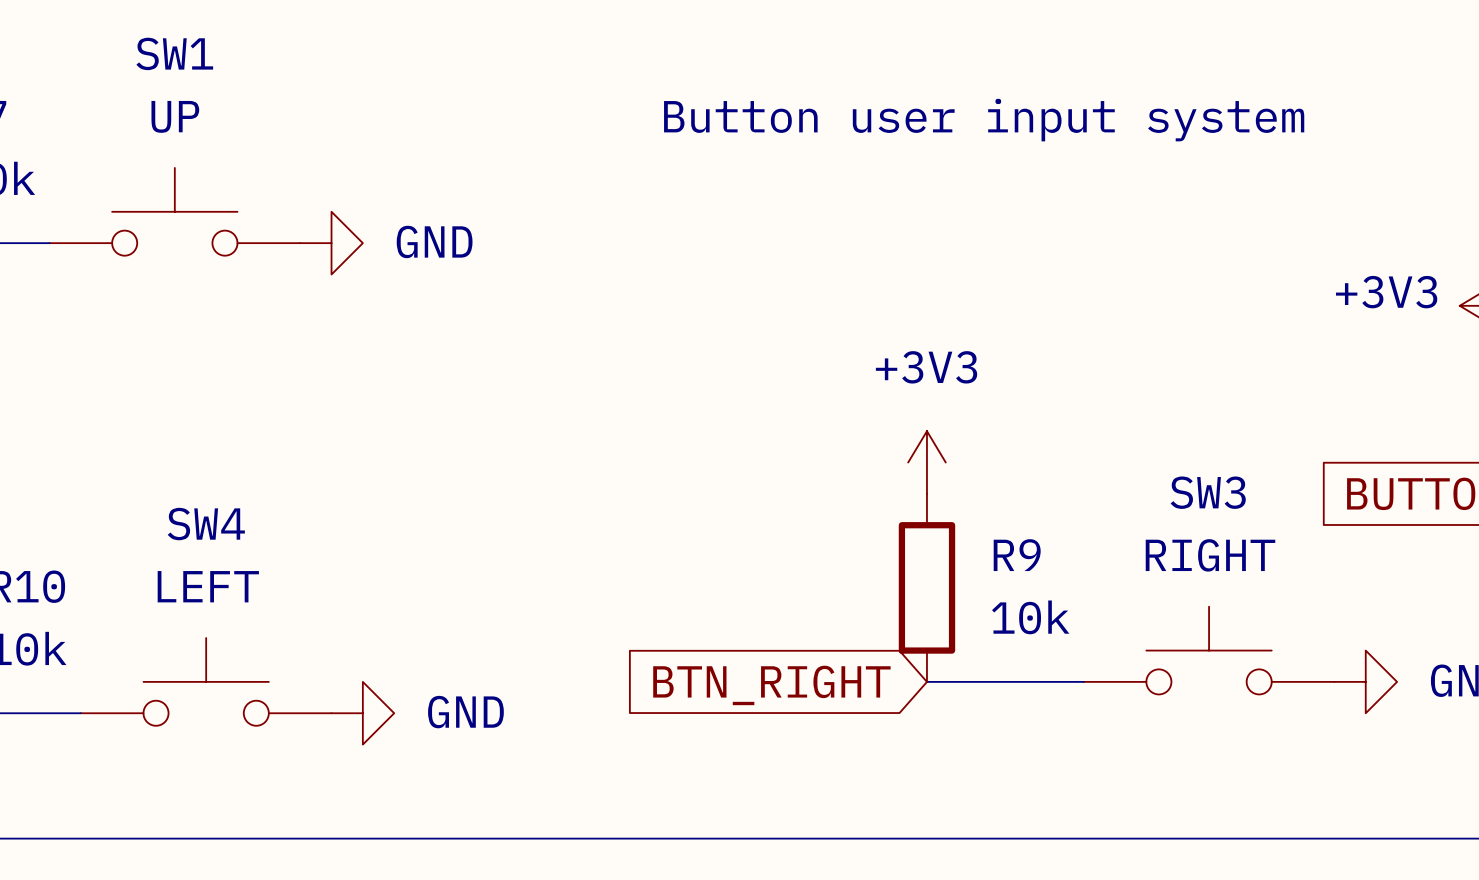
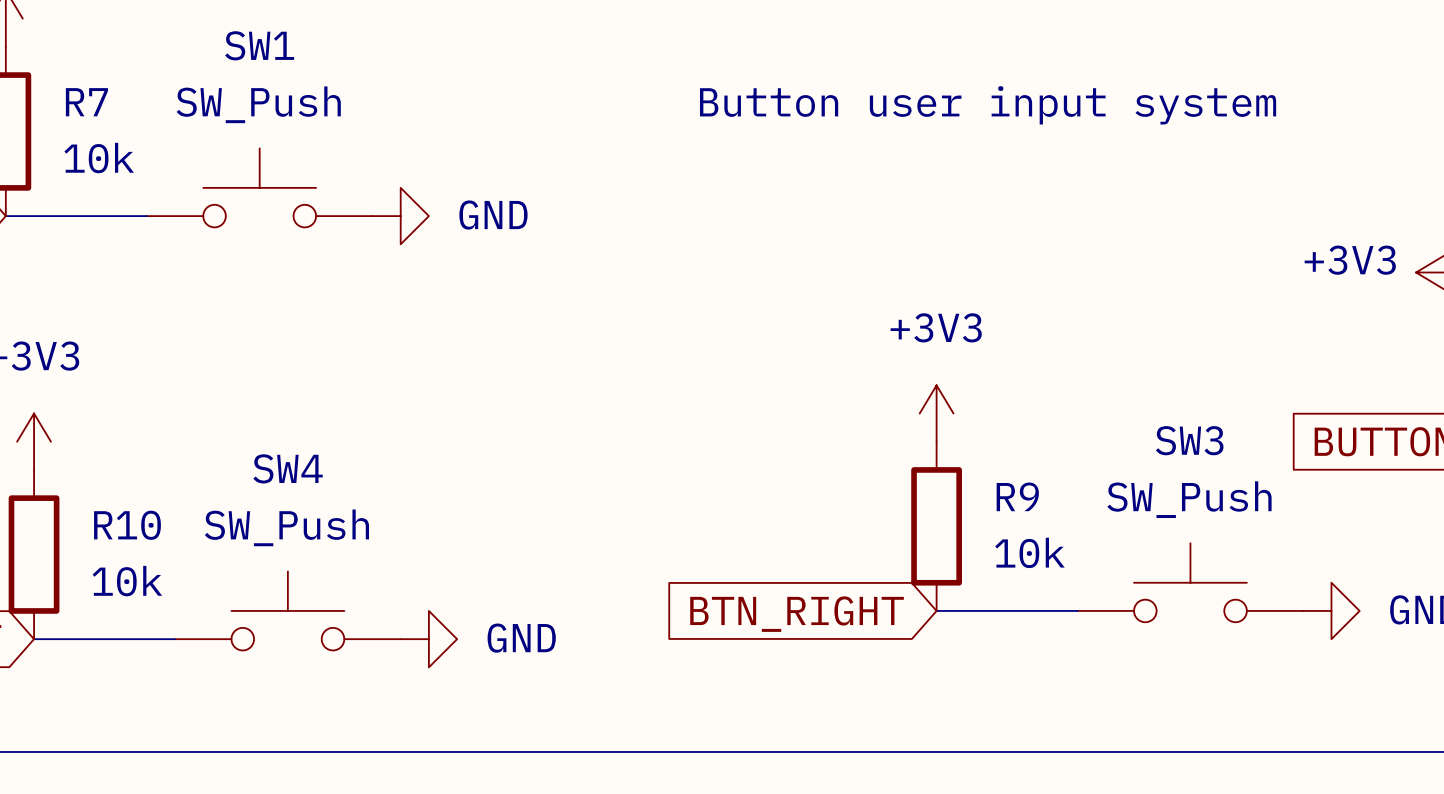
SW1 value: UP (175, 116) -> SW_Push (258, 104)
SW3 value: RIGHT (1210, 555) -> SW_Push (1189, 499)
SW4 value: LEFT (208, 586) -> SW_Push (286, 527)

